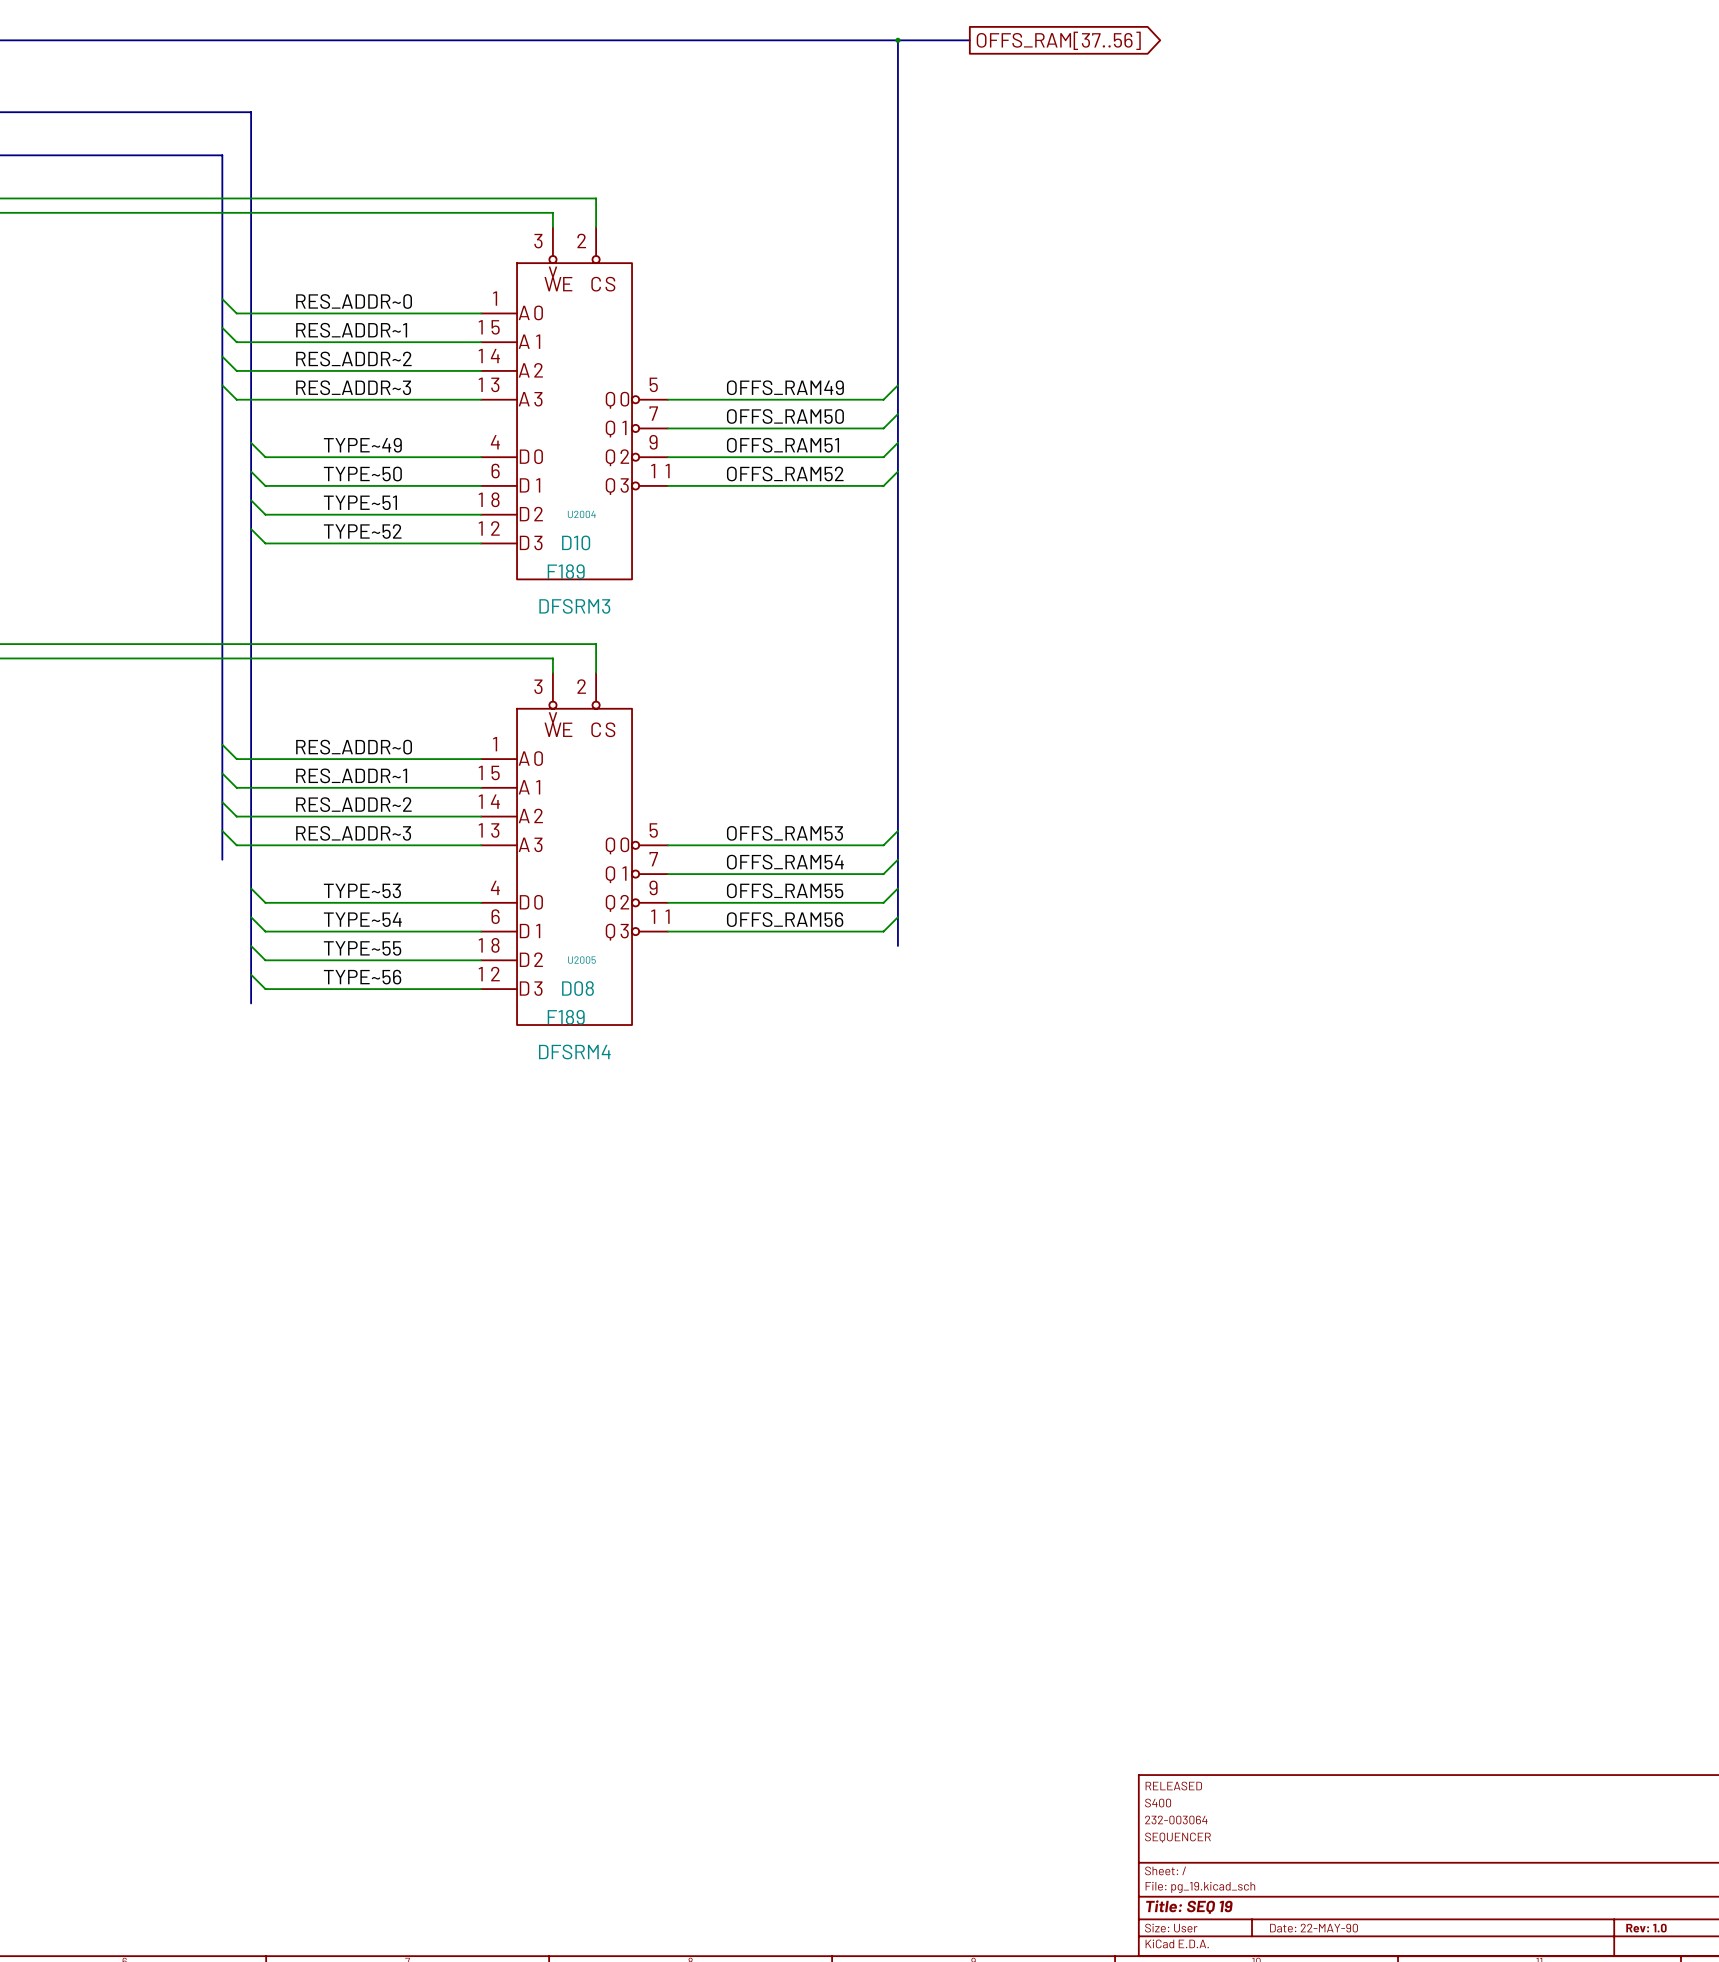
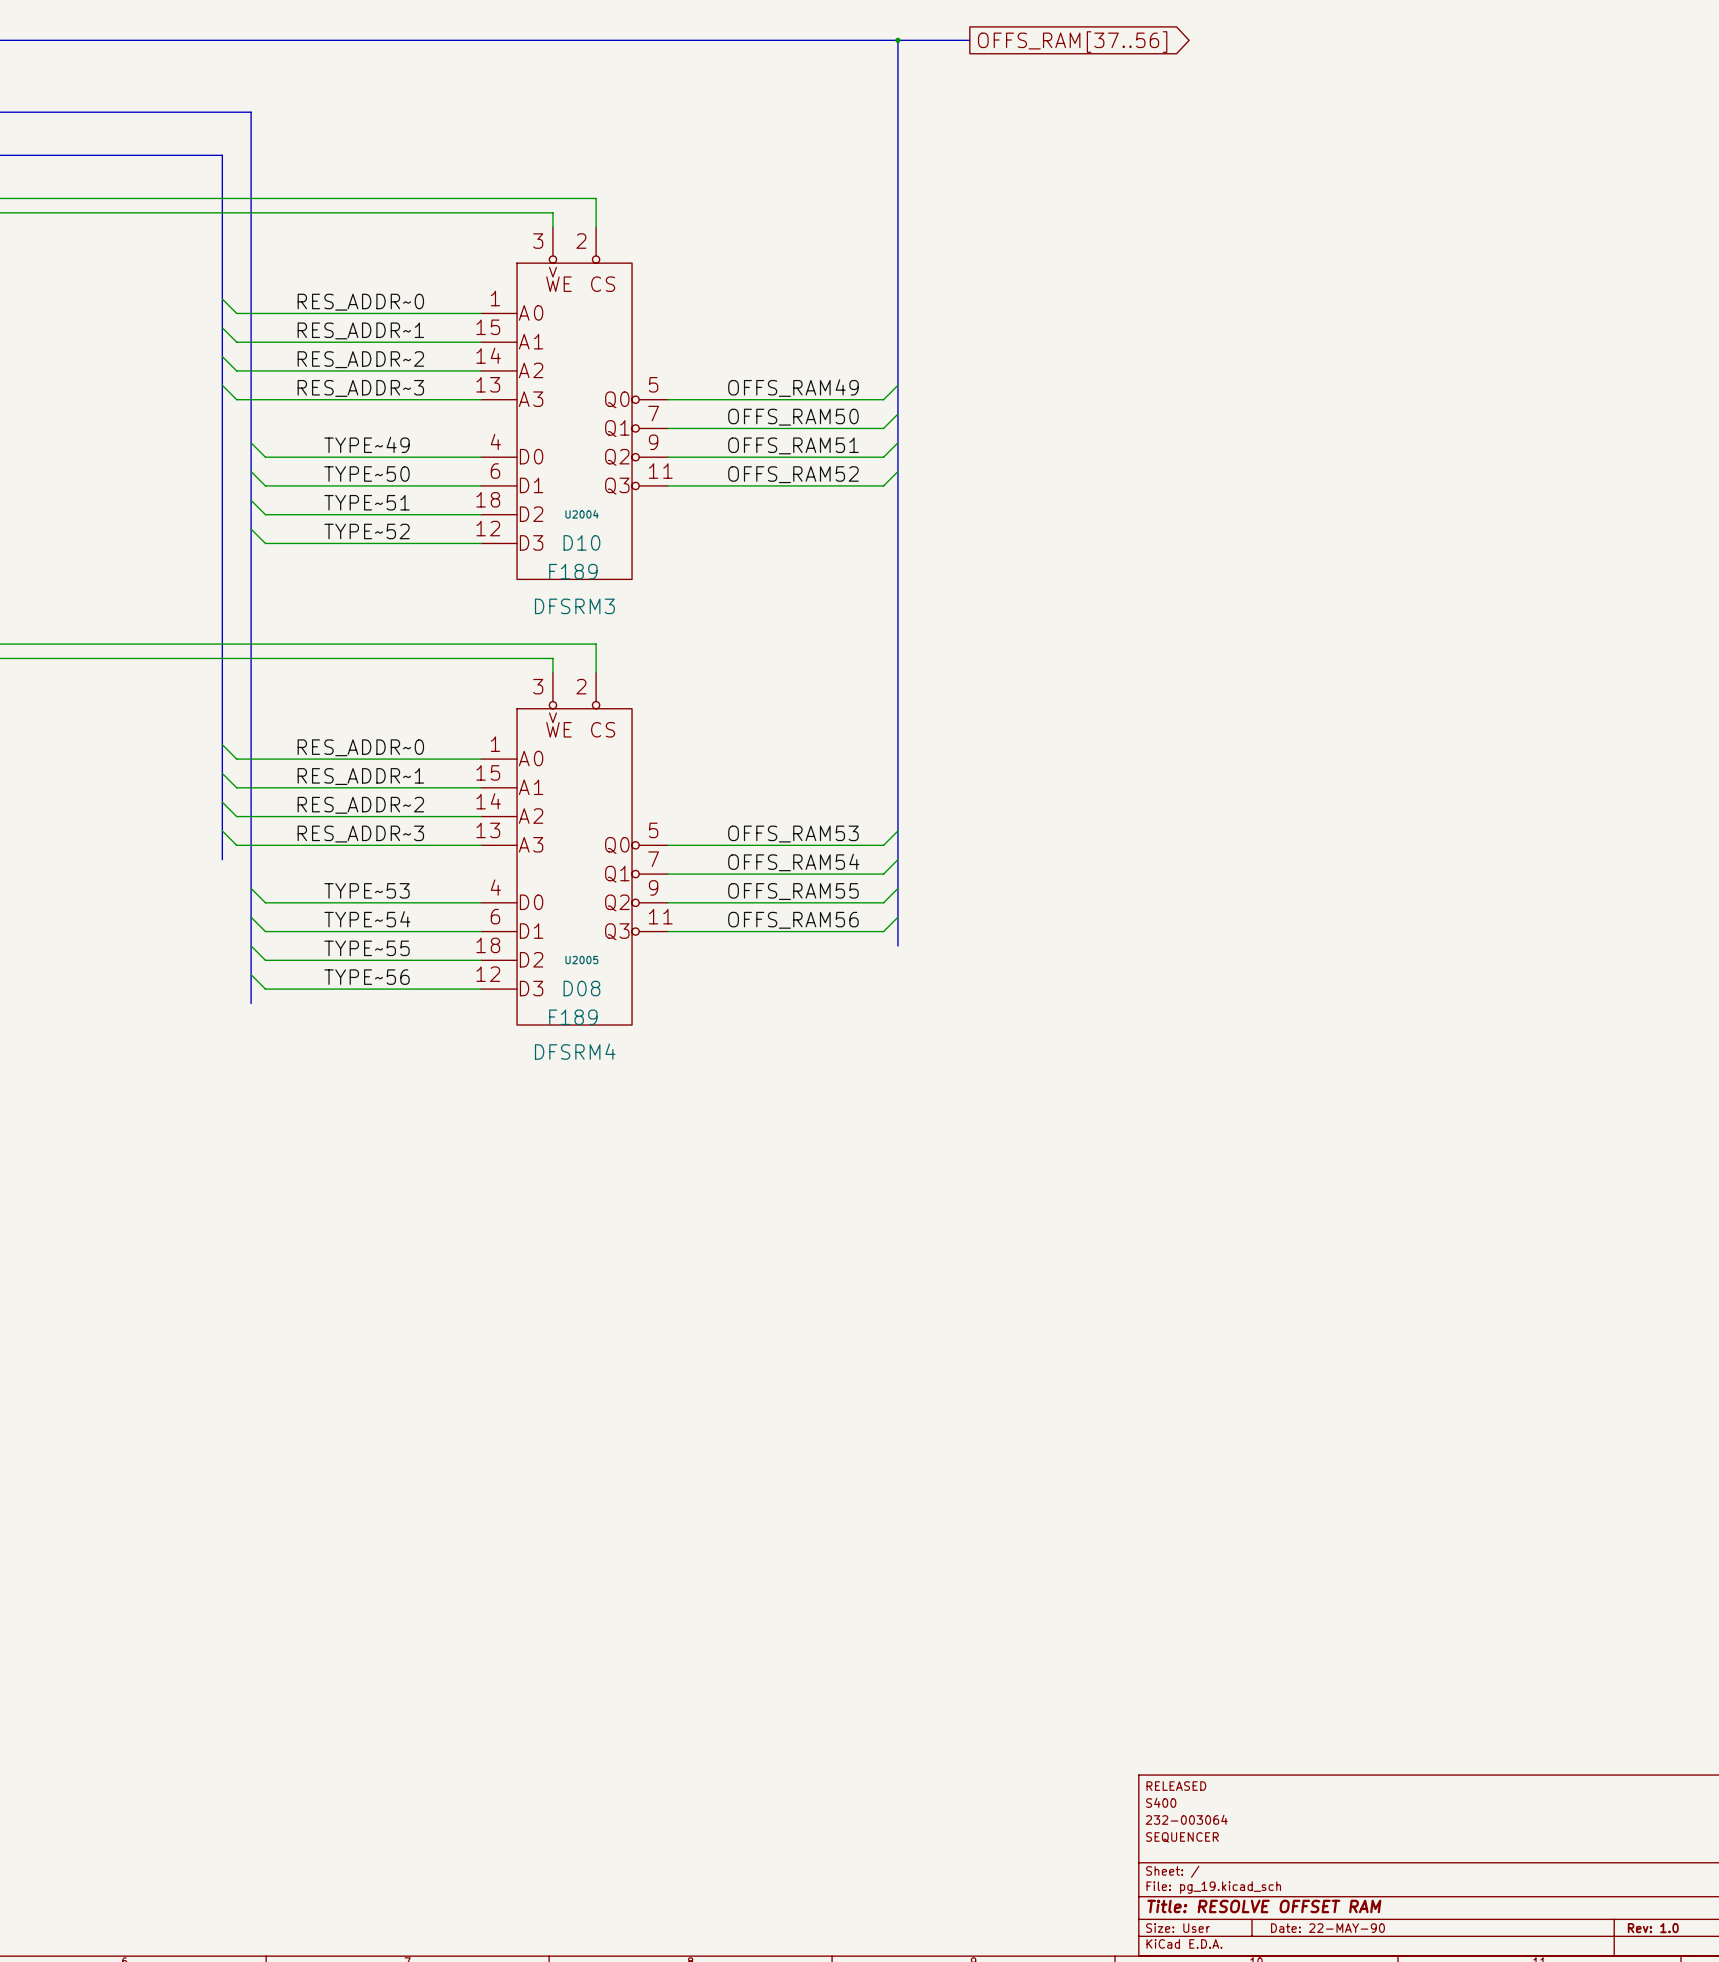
title block: Title: SEQ 19 (1189, 1907) -> Title: RESOLVE OFFSET RAM (1264, 1906)

